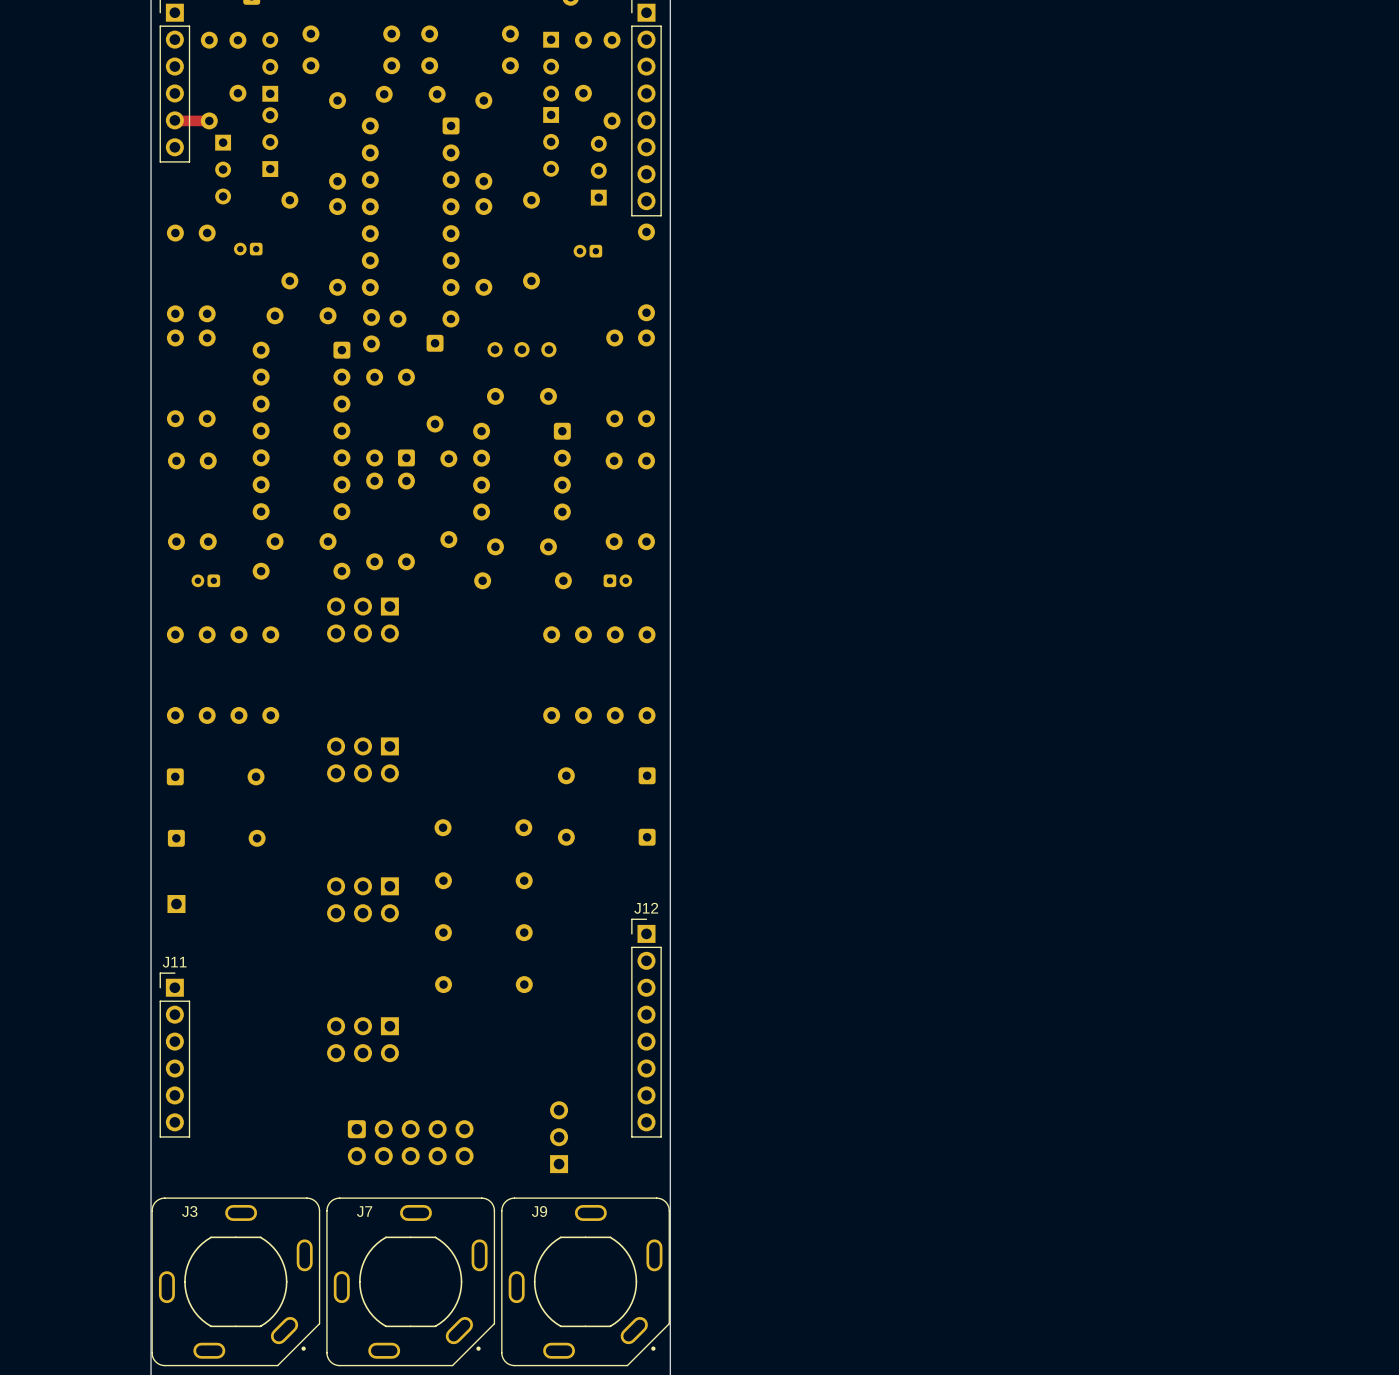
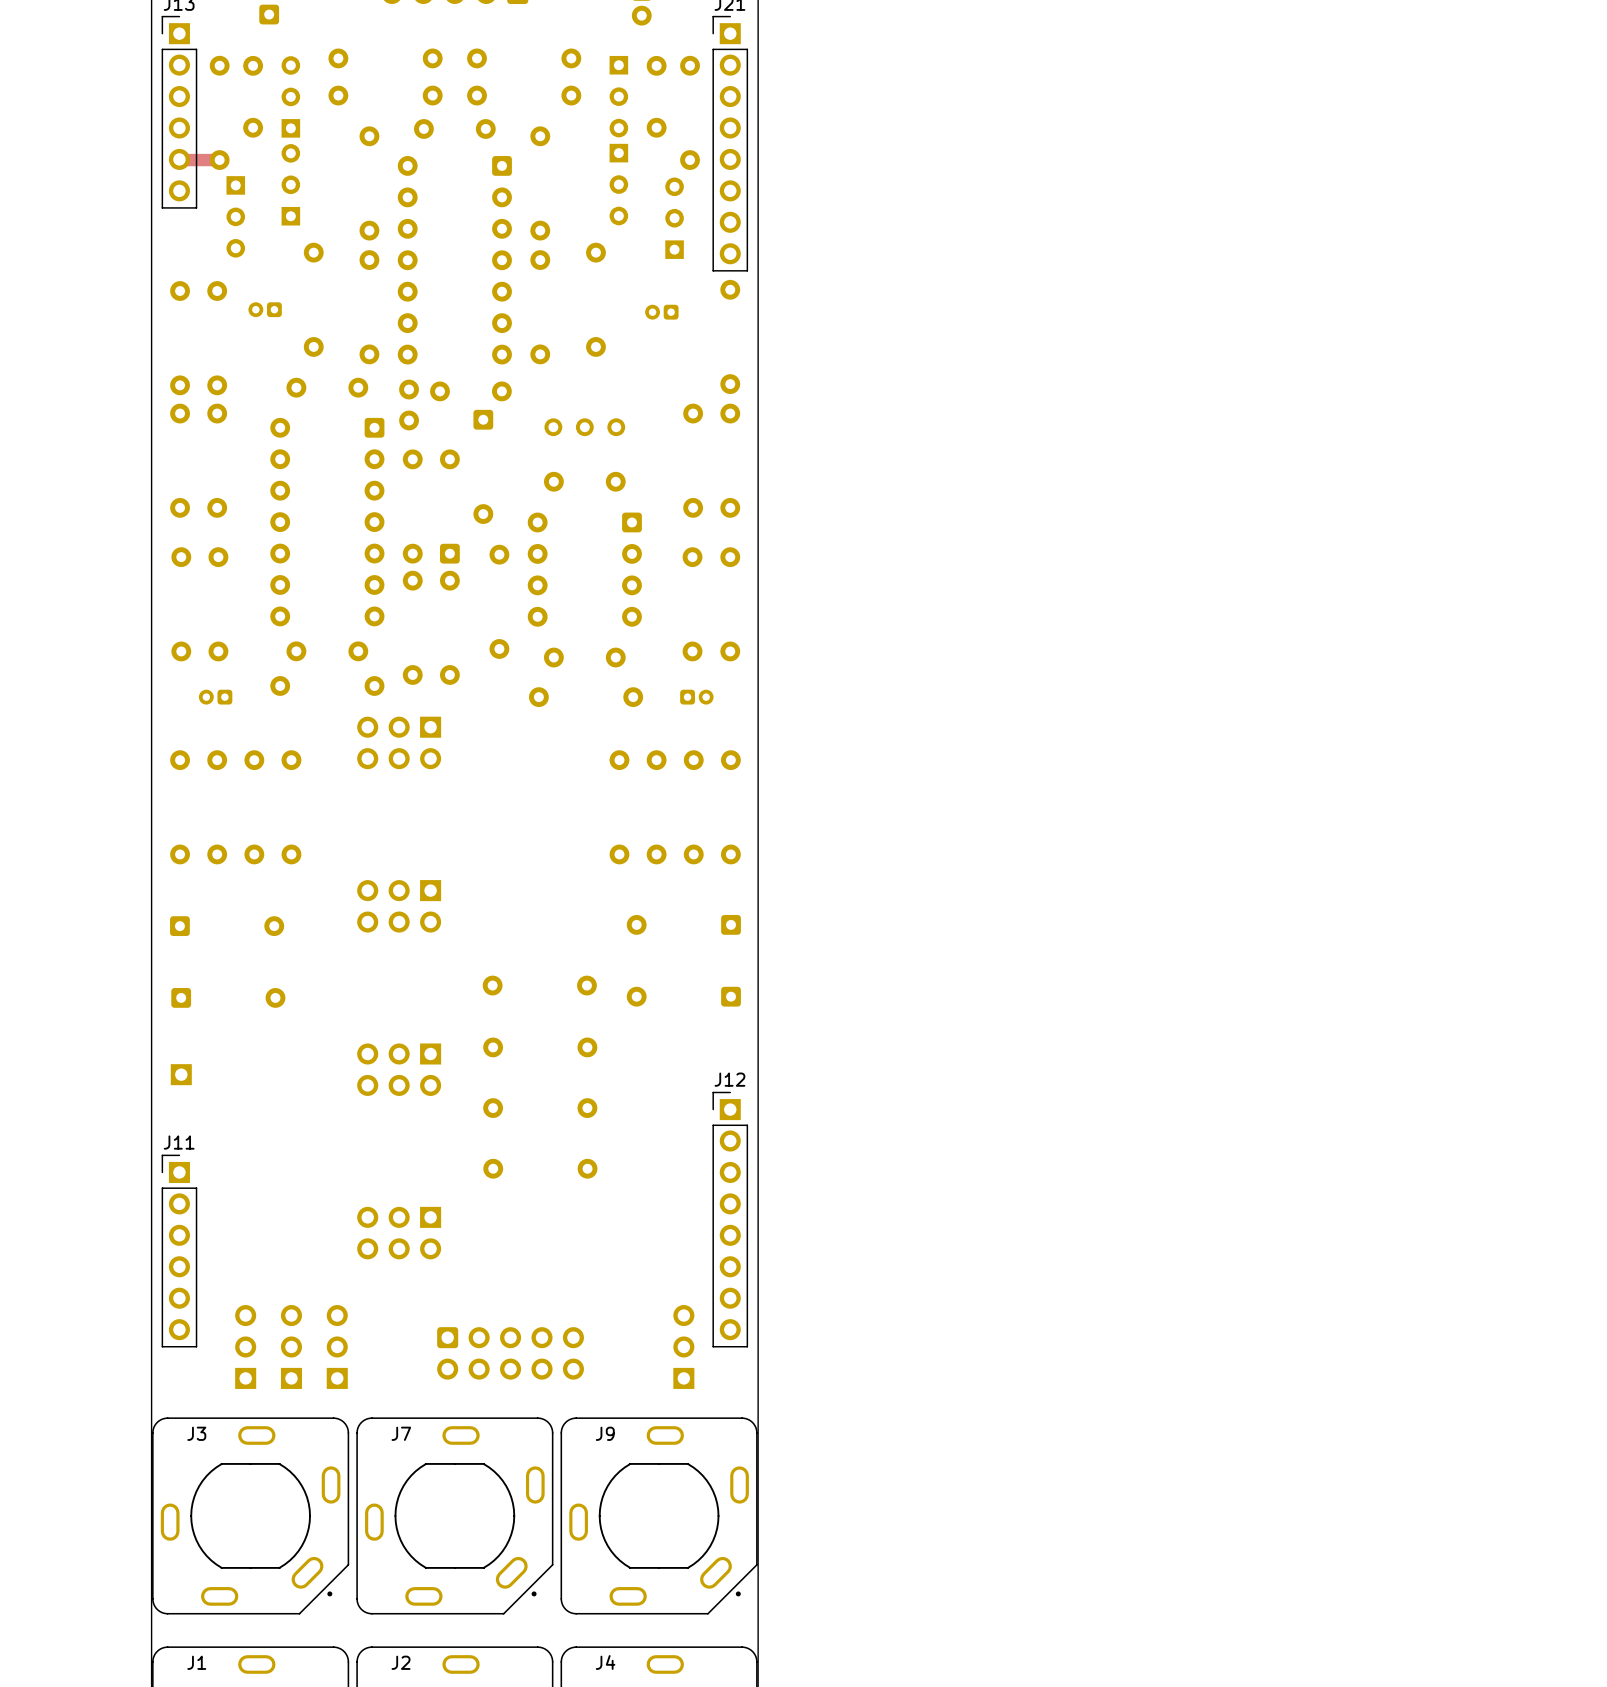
part: none -> (245, 1346)
part: none -> (291, 1346)
part: none -> (337, 1346)
part position: (559, 1137) -> (683, 1346)
part position: (410, 1142) -> (510, 1353)

